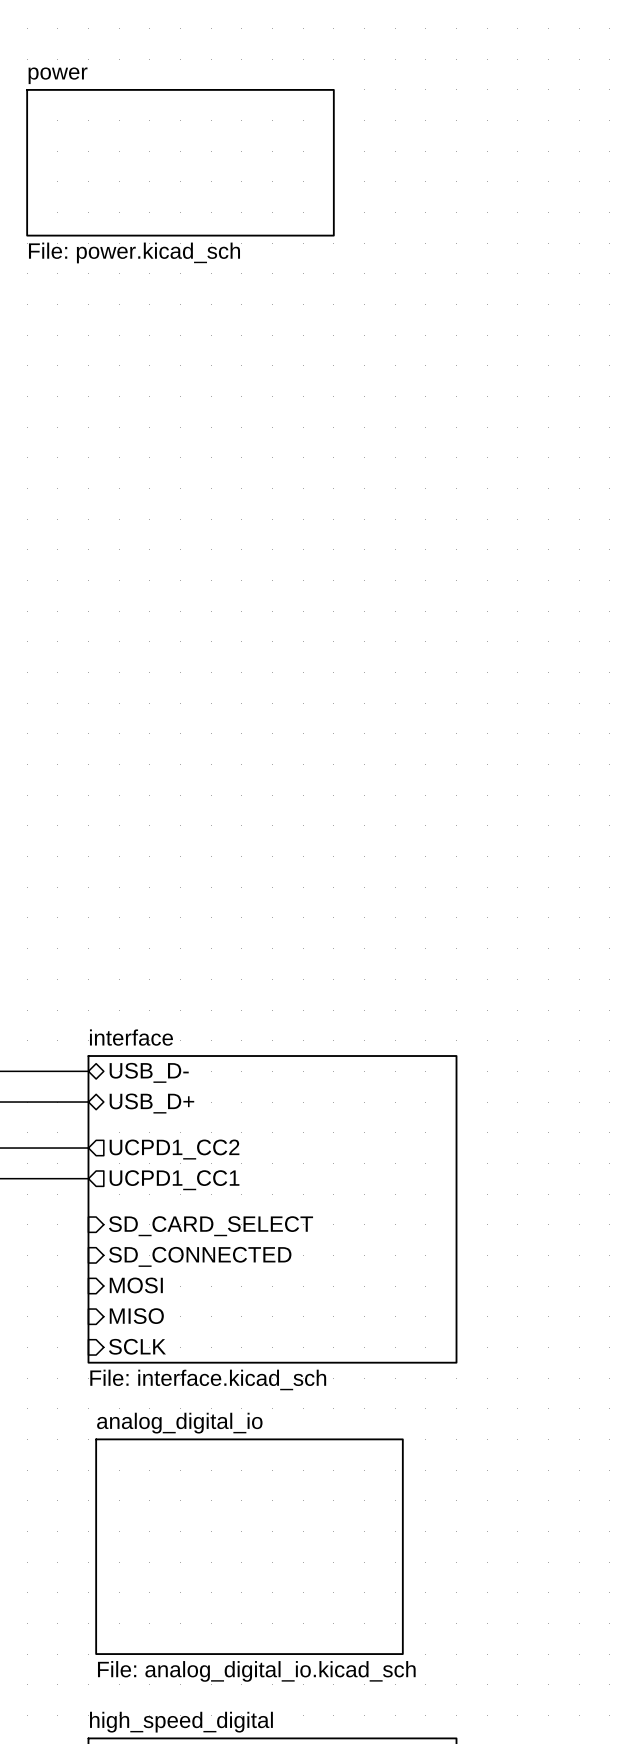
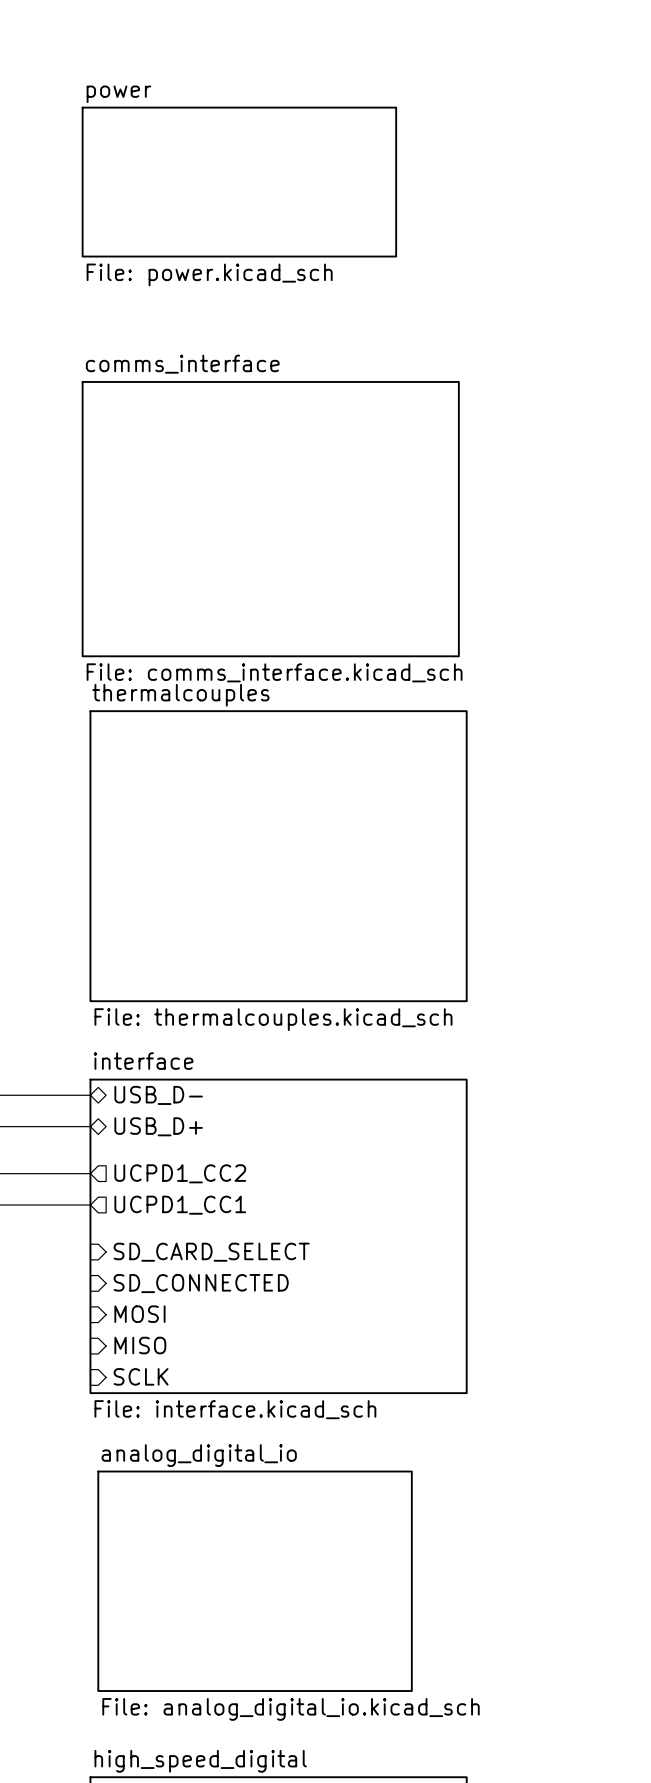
sheet power position: (180, 162) -> (239, 182)
sheet comms_interface: none -> File: comms_interface.kicad_sch (270, 519)
sheet thermalcouples: none -> File: thermalcouples.kicad_sch (278, 856)

